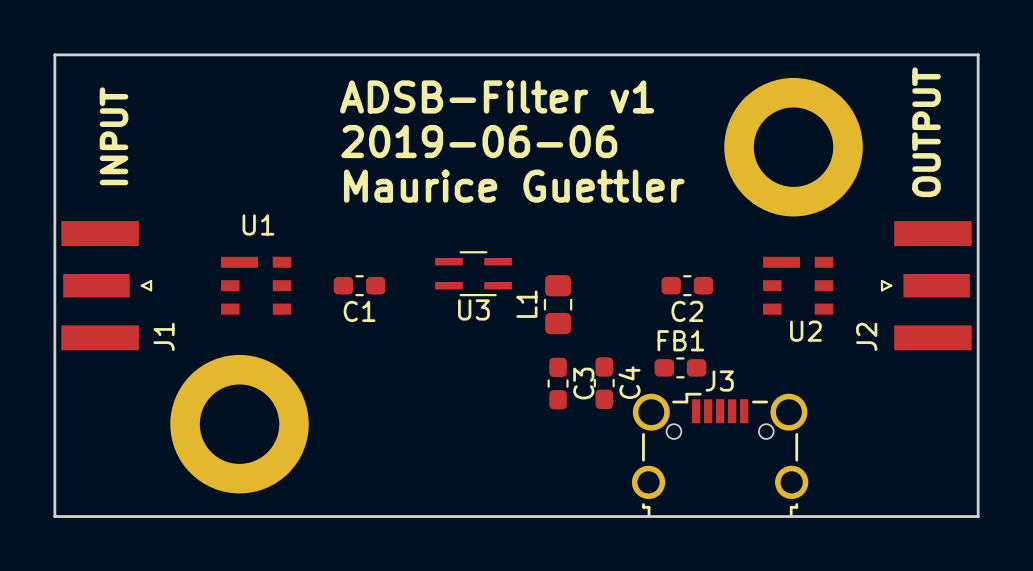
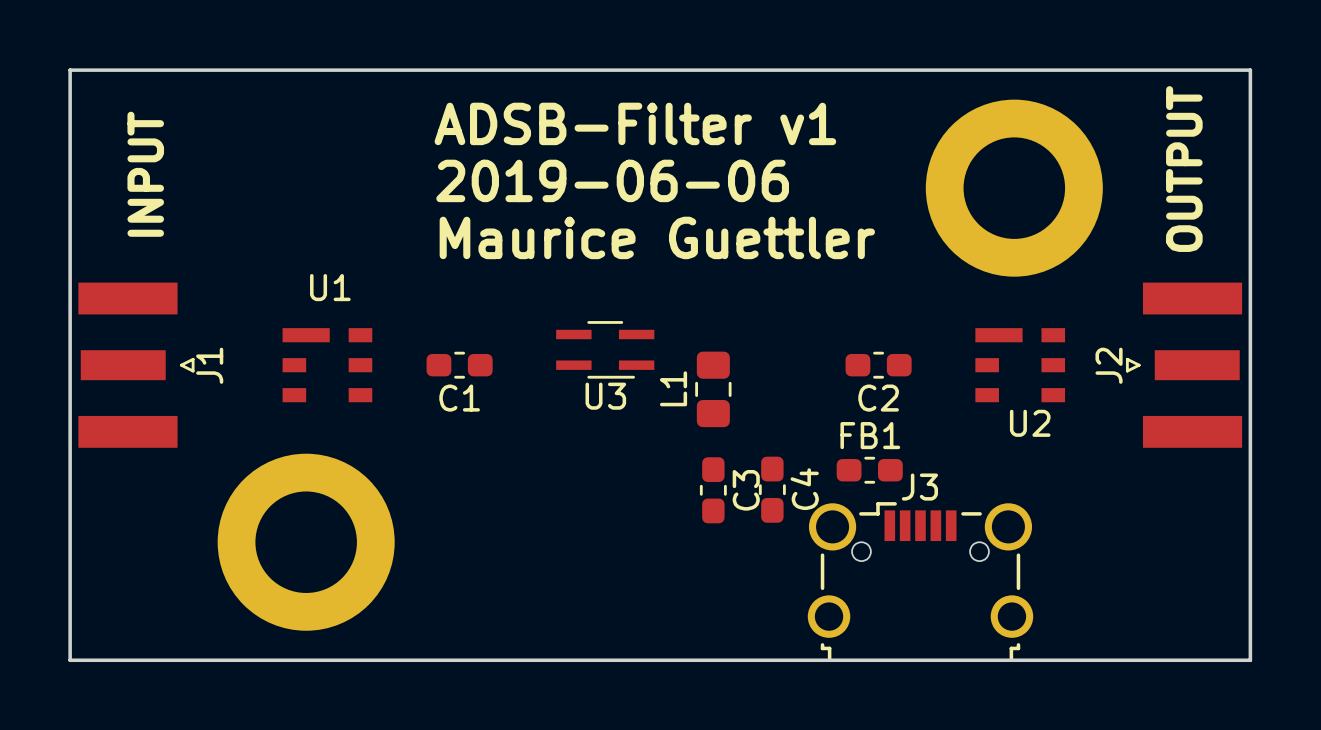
J1 name position: J1 (164, 336) -> J1 (209, 365)
J2 name position: J2 (866, 336) -> J2 (1109, 365)

